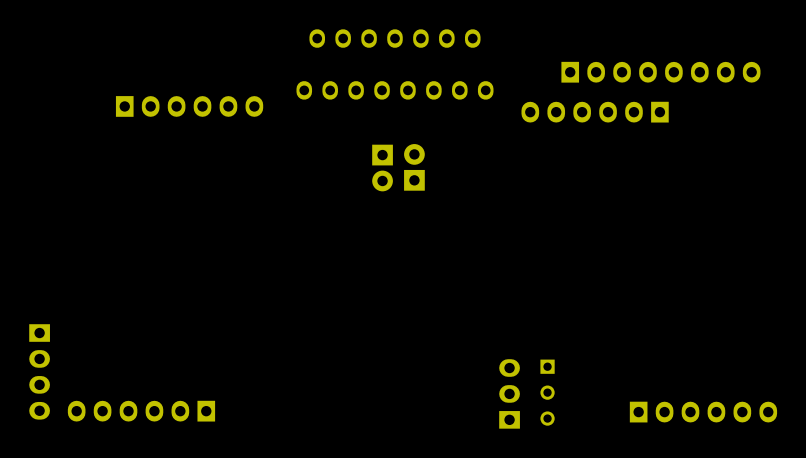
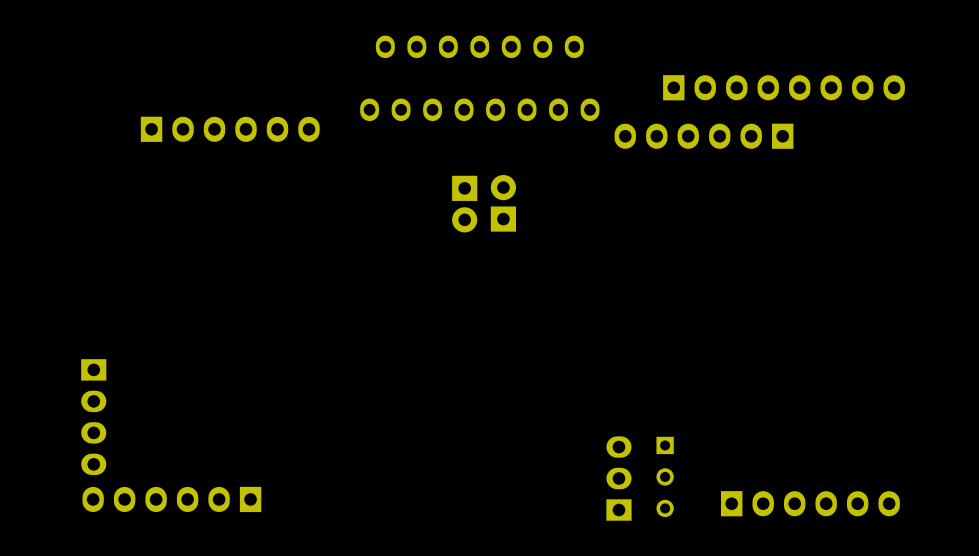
part position: (660, 72) -> (783, 87)
part position: (595, 112) -> (704, 136)
part position: (39, 371) -> (93, 417)
part position: (703, 412) -> (810, 503)

